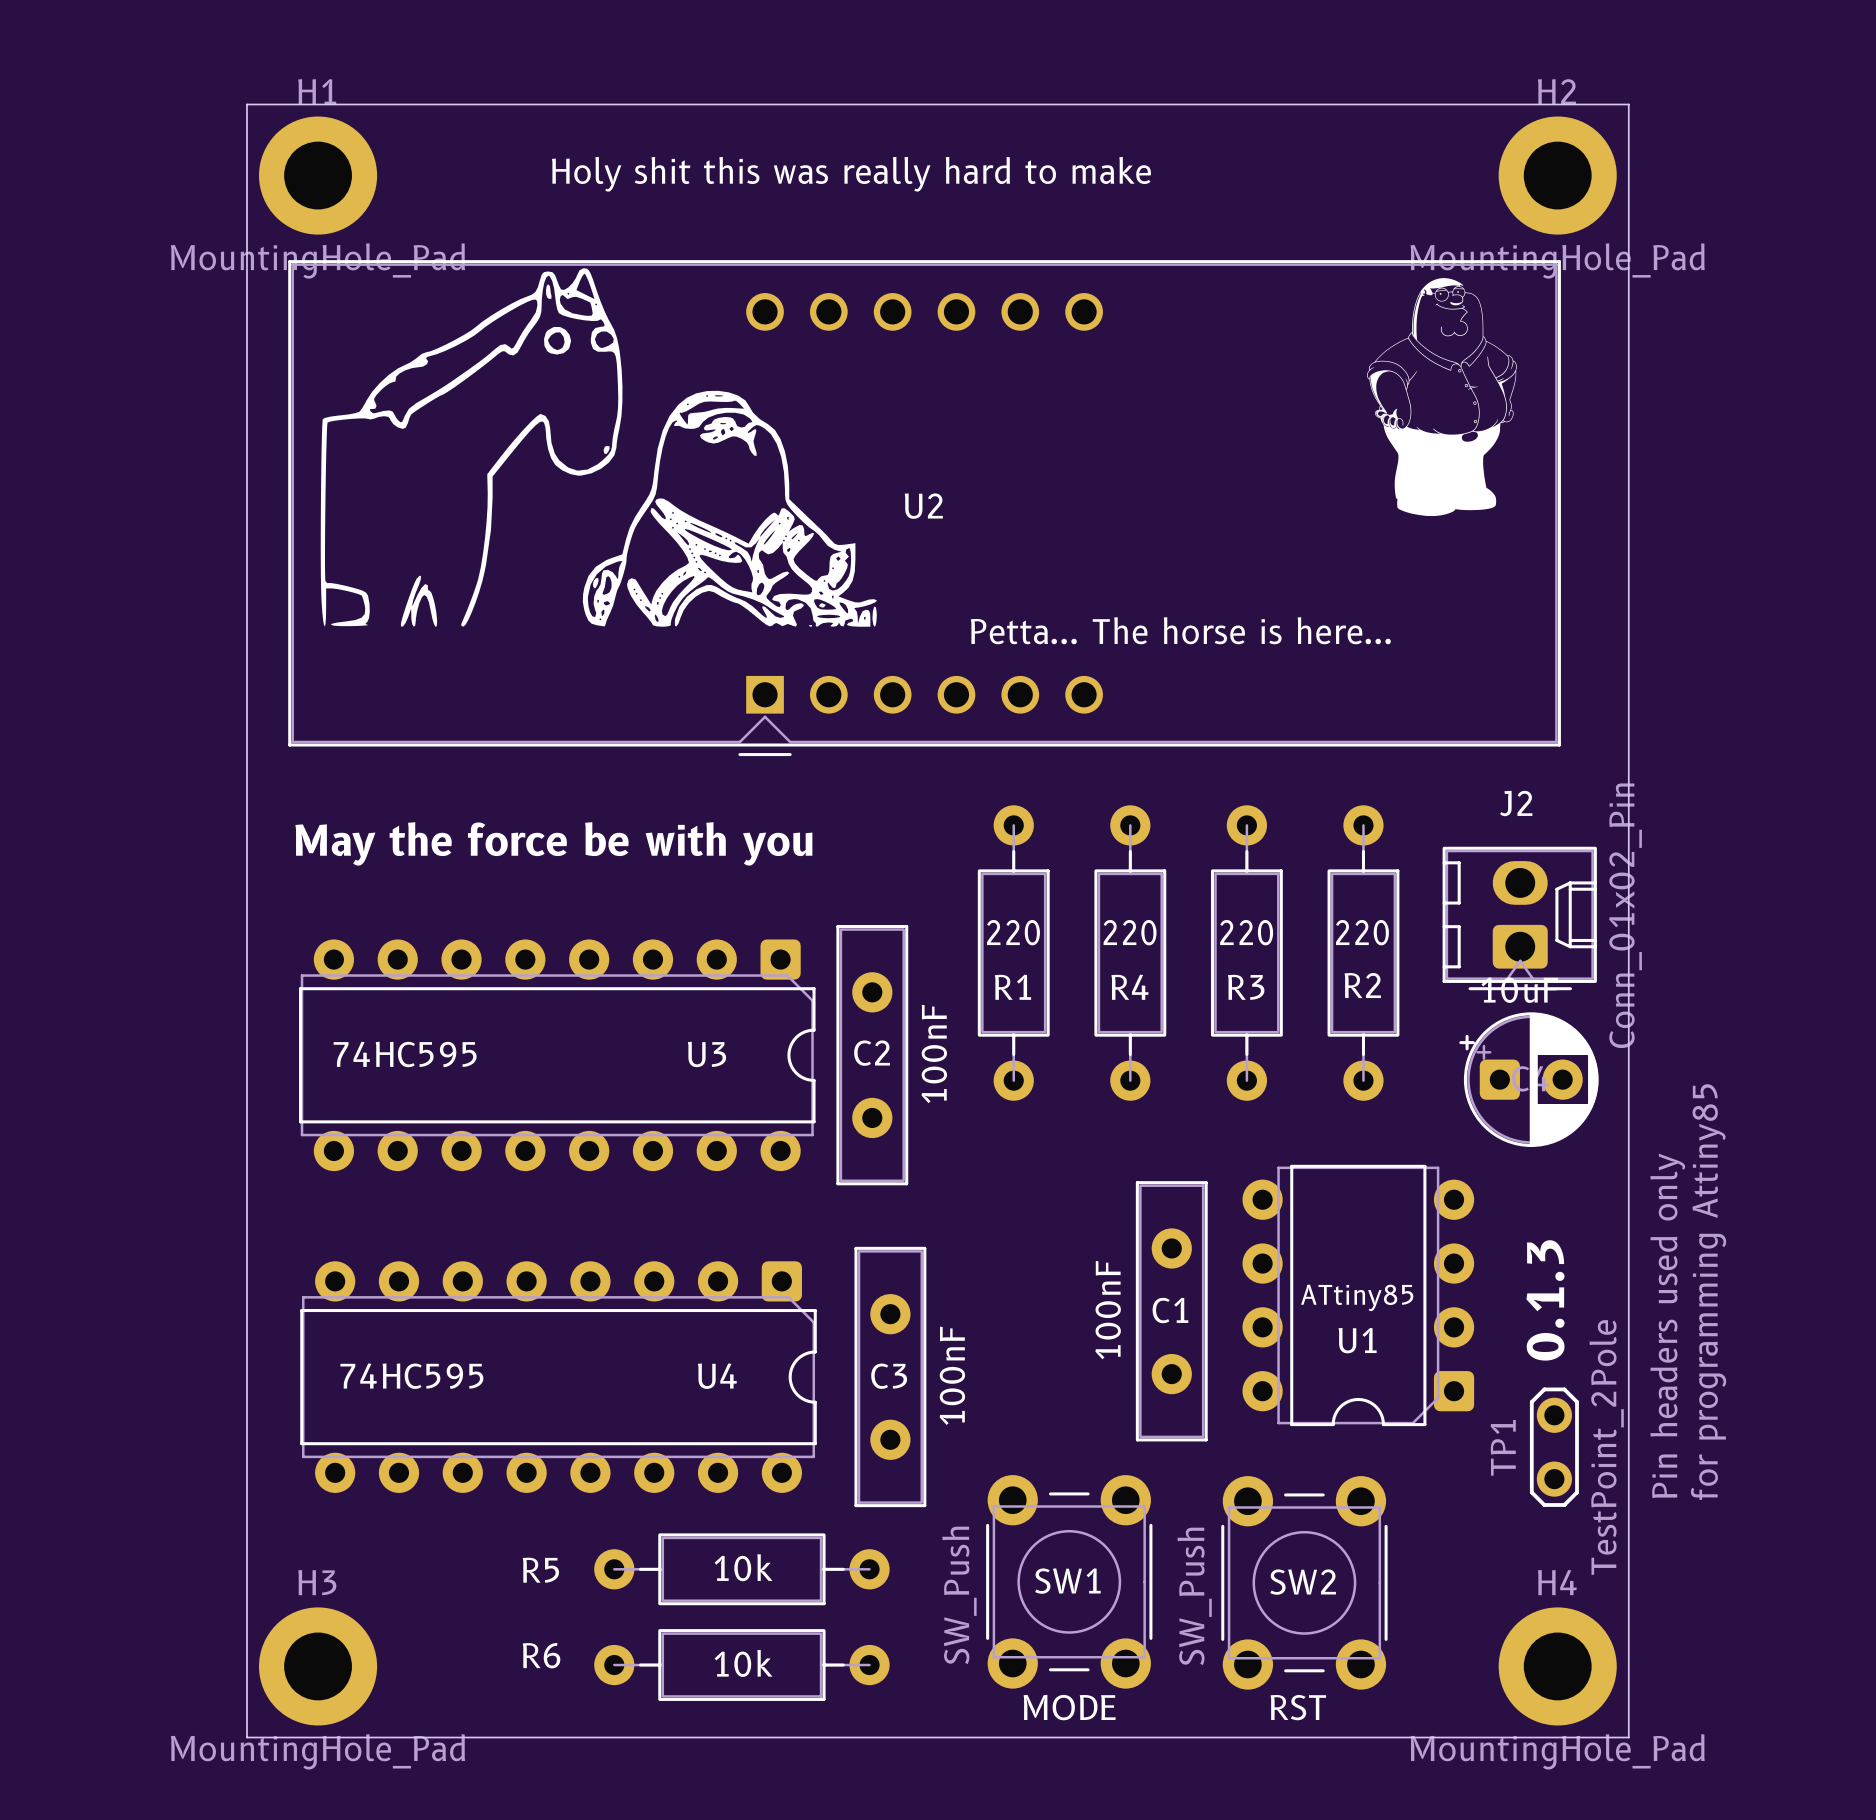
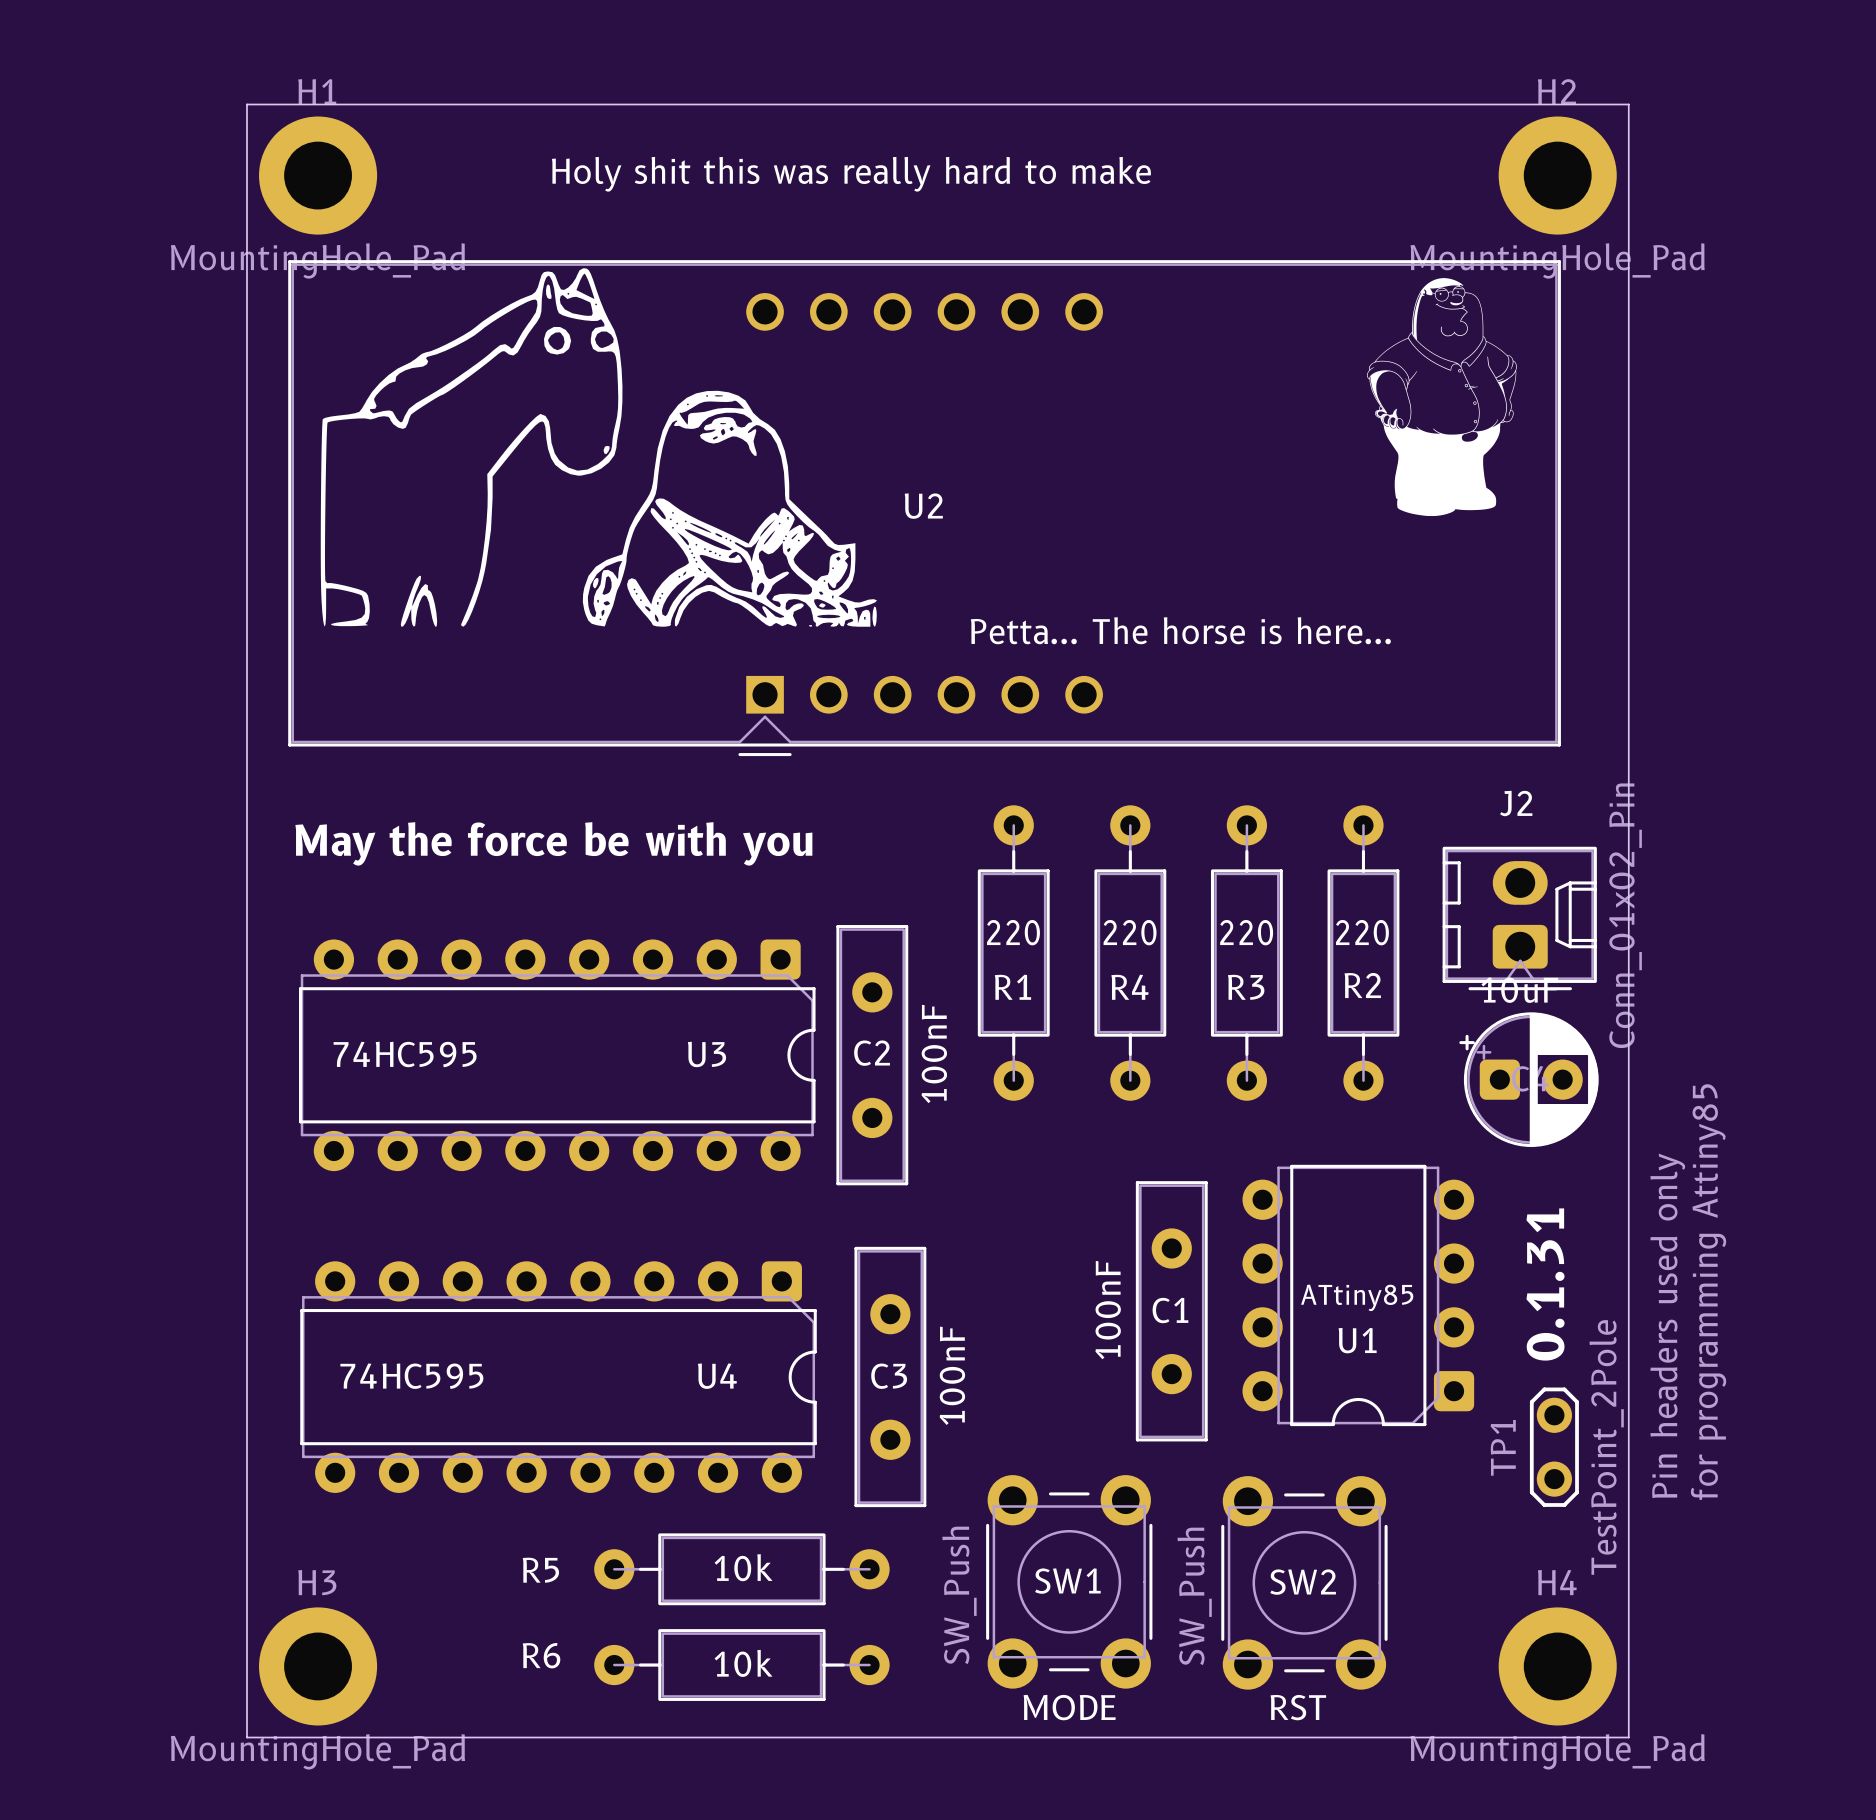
text: 0.1.3 (1545, 1300) -> 0.1.31 (1545, 1284)

